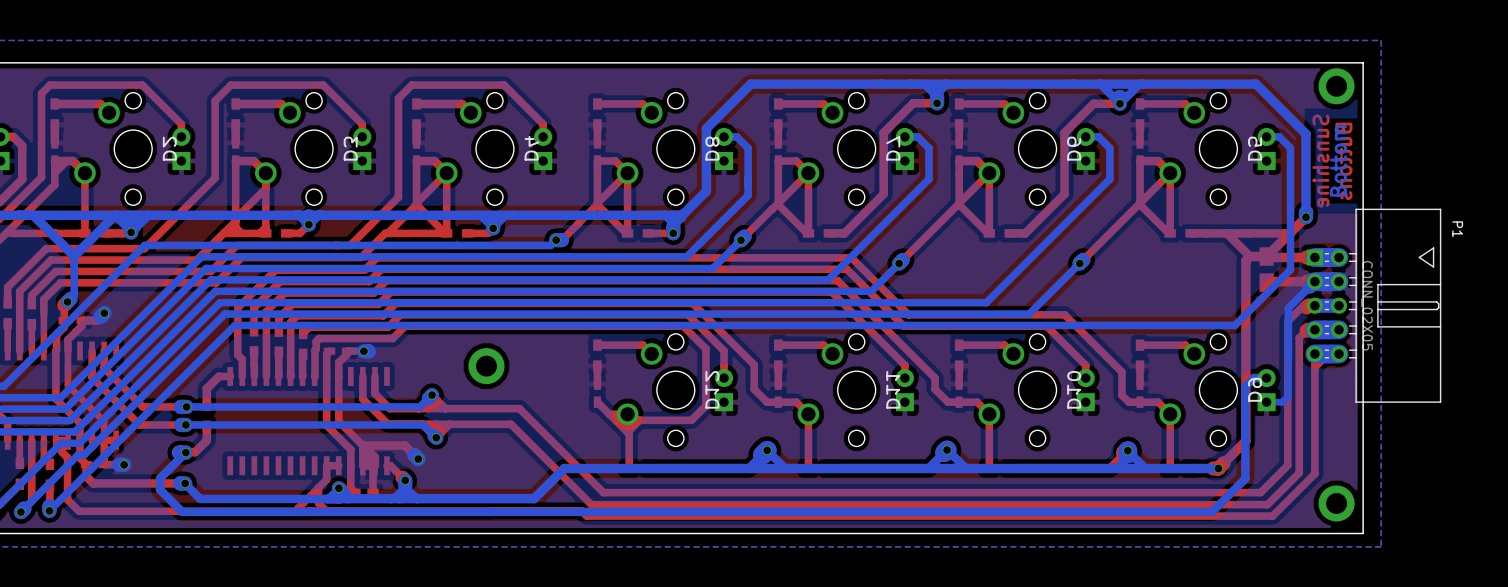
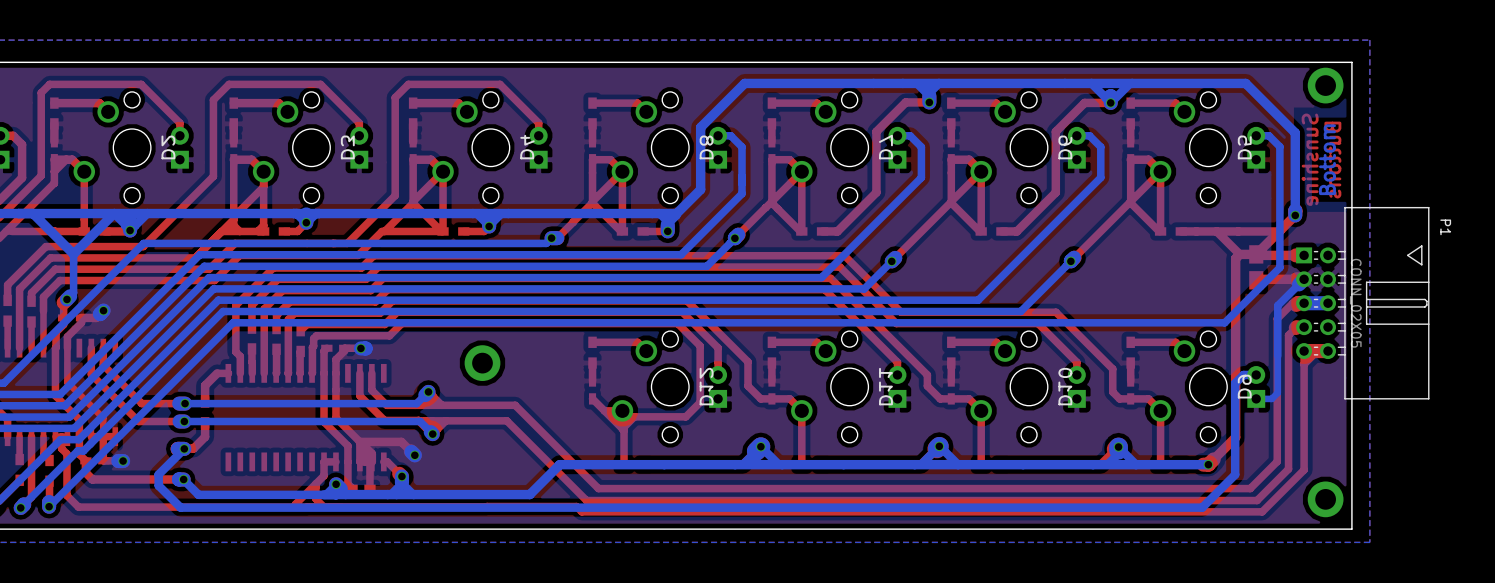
bottom track: (1339, 257) (1314, 257) -> none
bottom track: (1339, 281) (1314, 281) -> none
bottom track: (1339, 329) (1314, 329) -> none
bottom track: (1339, 353) (1314, 353) -> none

